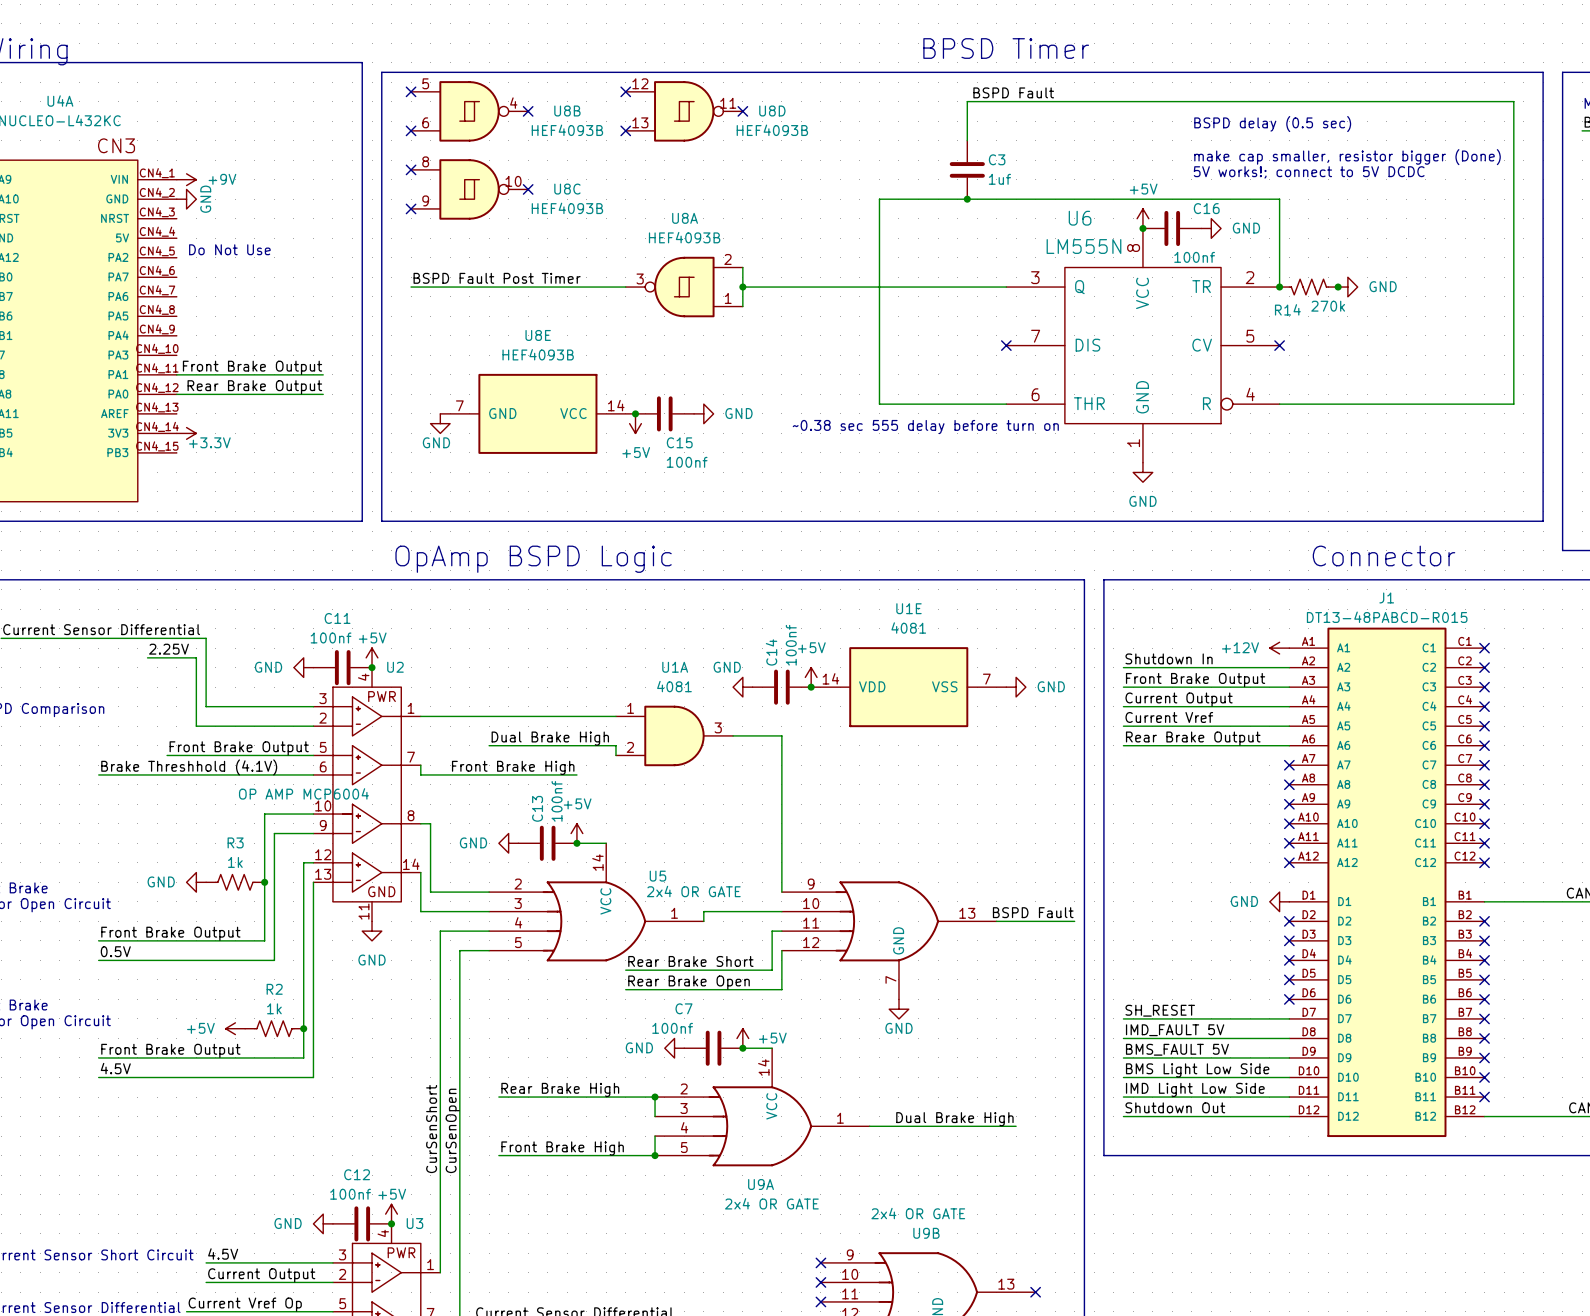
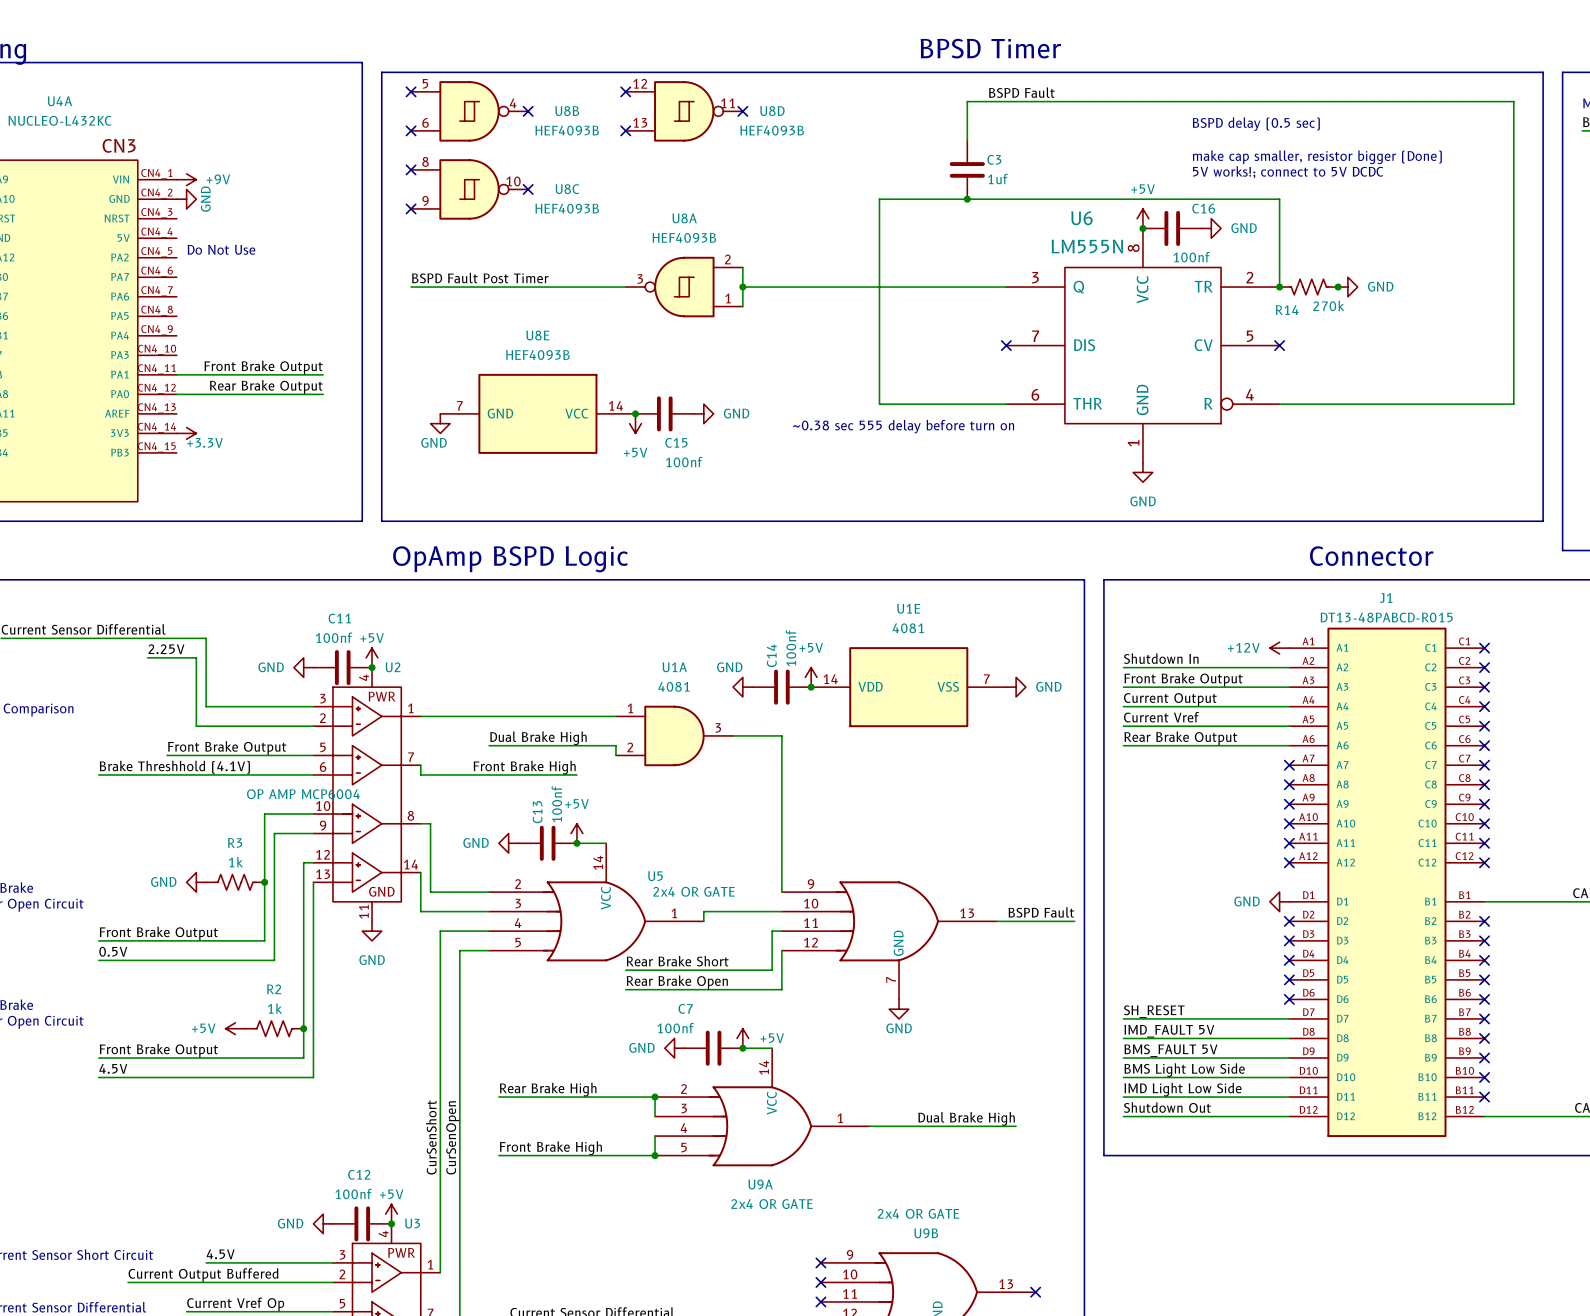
label: Current Output (261, 1275) -> Current Output Buffered (203, 1275)
wire: none -> (128, 1282) (206, 1282)

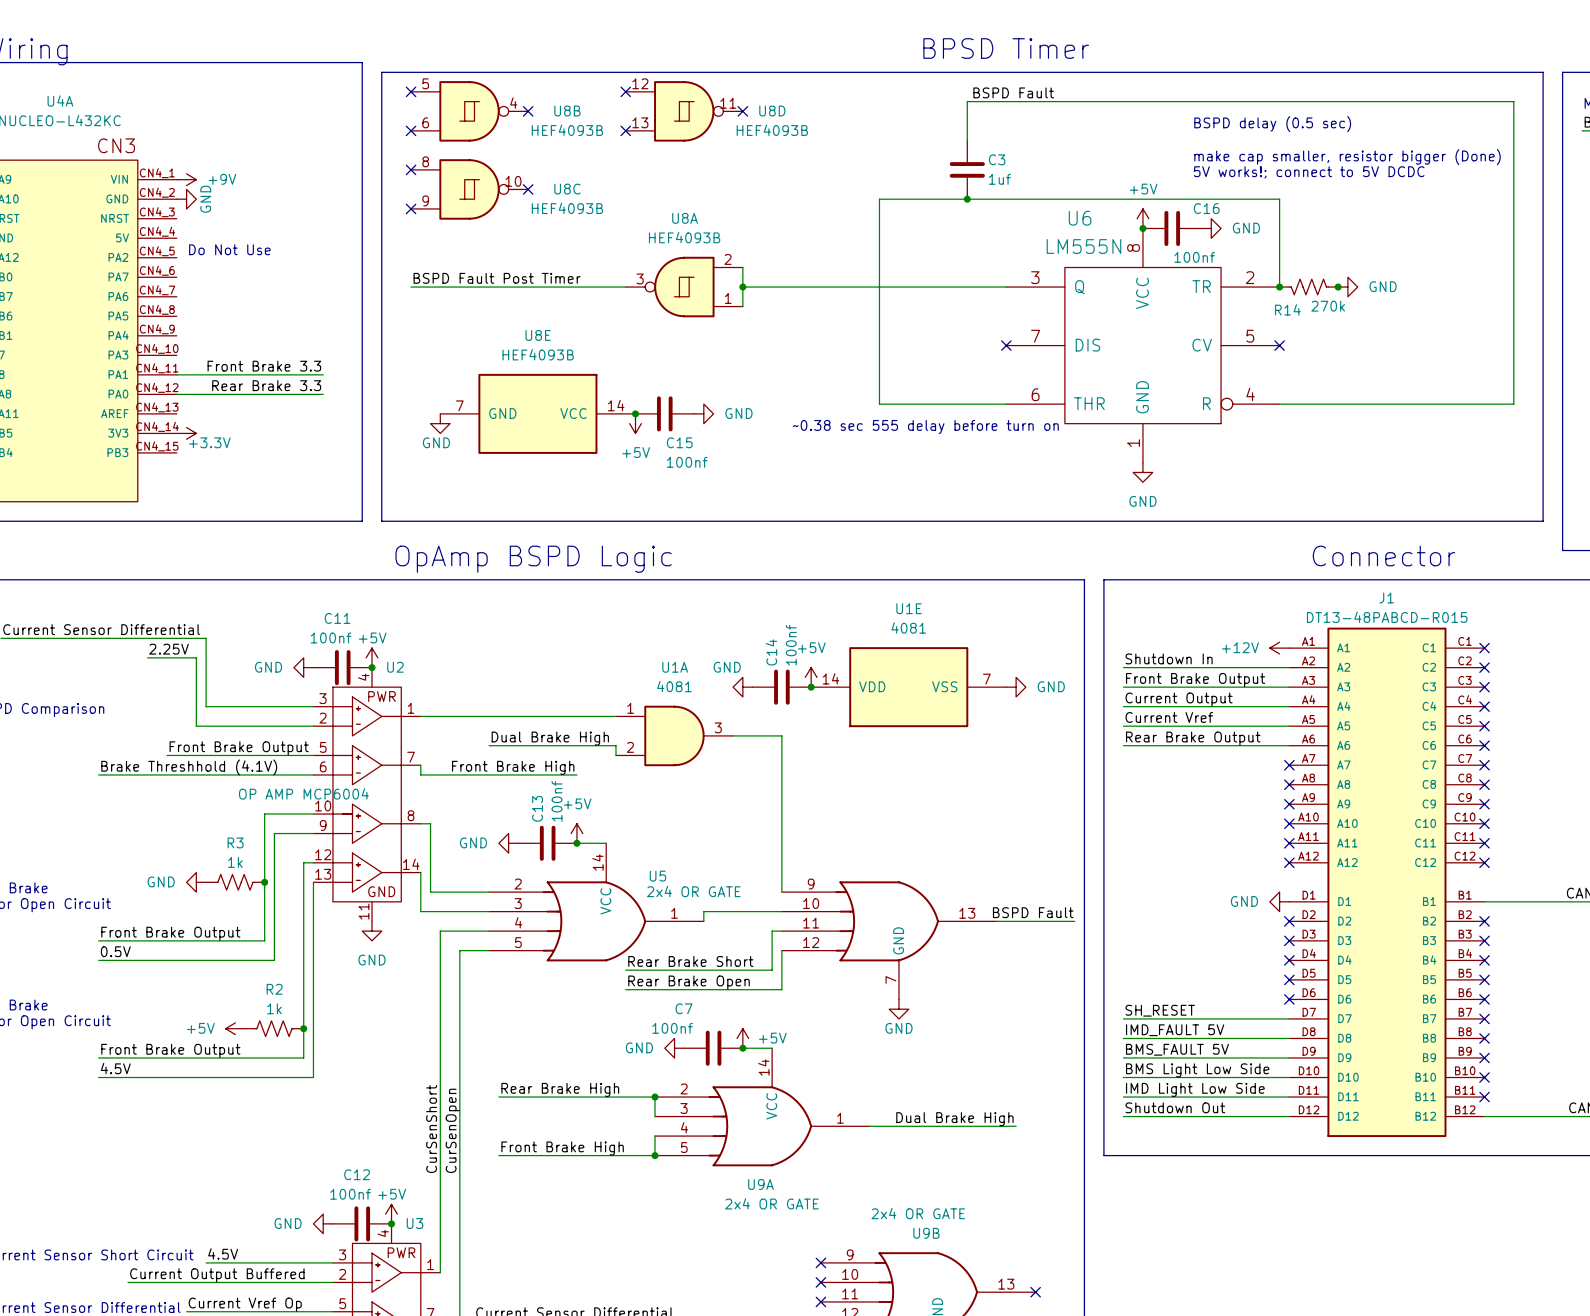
label: Front Brake Output (263, 367) -> Front Brake 3.3 (264, 366)
label: Rear Brake Output (266, 386) -> Rear Brake 3.3 (266, 385)

